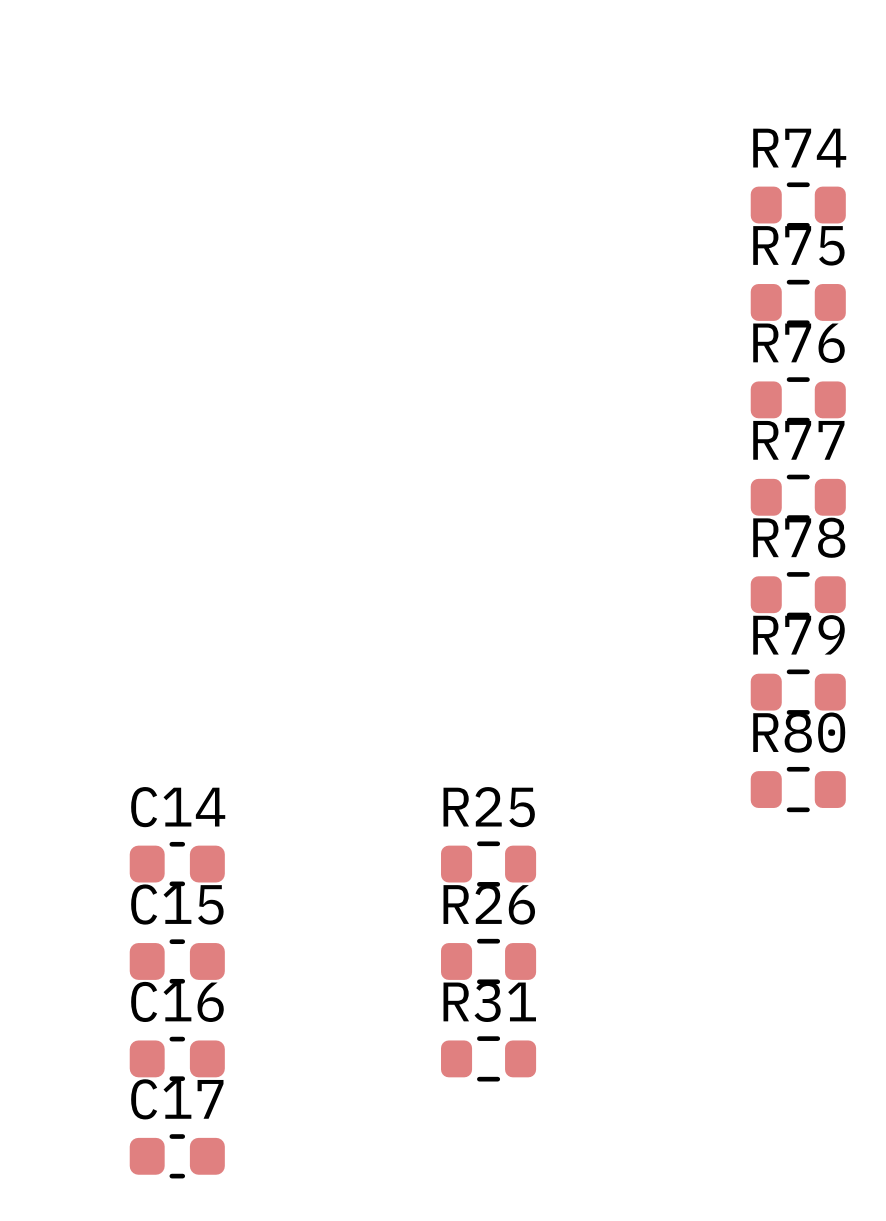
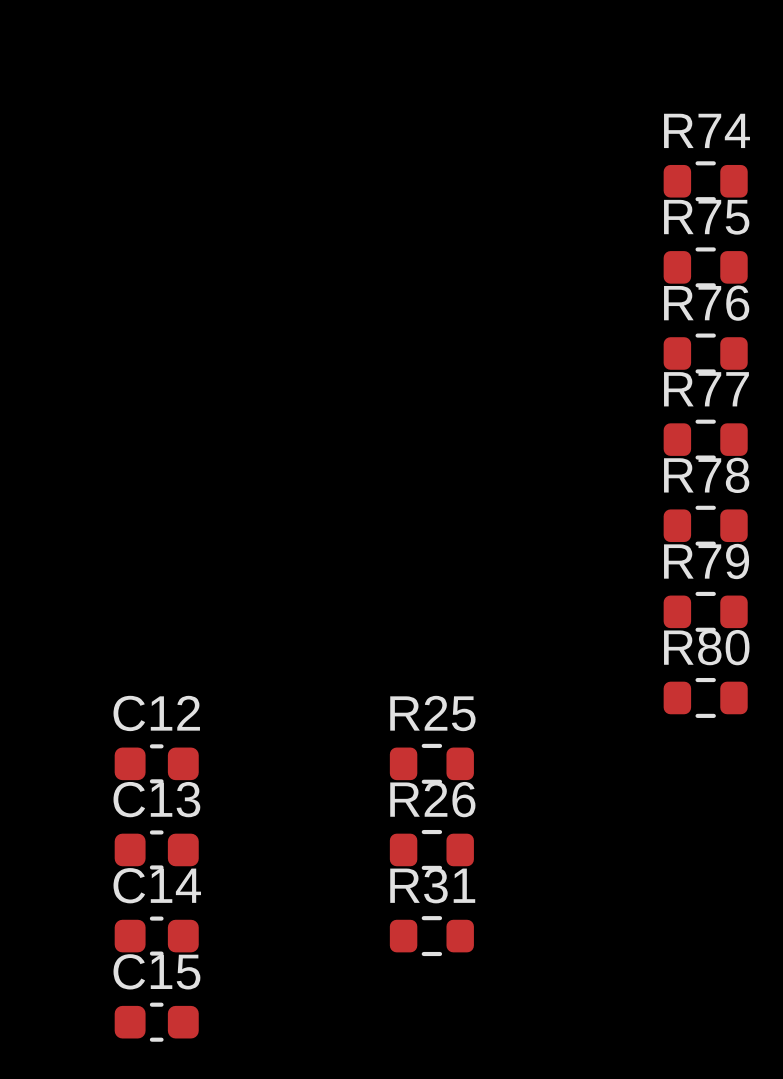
C14 name: C14 (178, 807) -> C12 (156, 713)
C15 name: C15 (177, 904) -> C13 (156, 799)
C16 name: C16 (177, 1001) -> C14 (157, 885)
C17 name: C17 (177, 1099) -> C15 (156, 971)

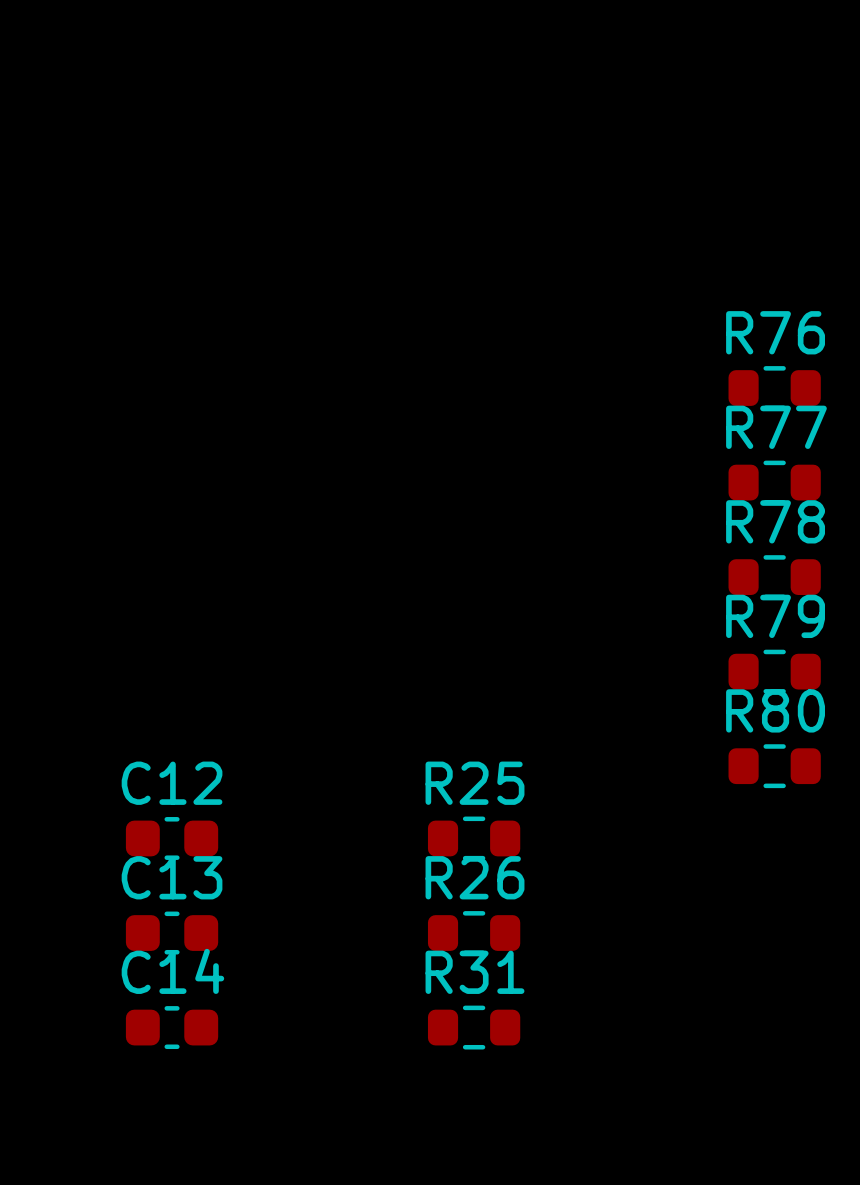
R74: (705, 181) -> none
R75: (705, 267) -> none
C15: (156, 1022) -> none

